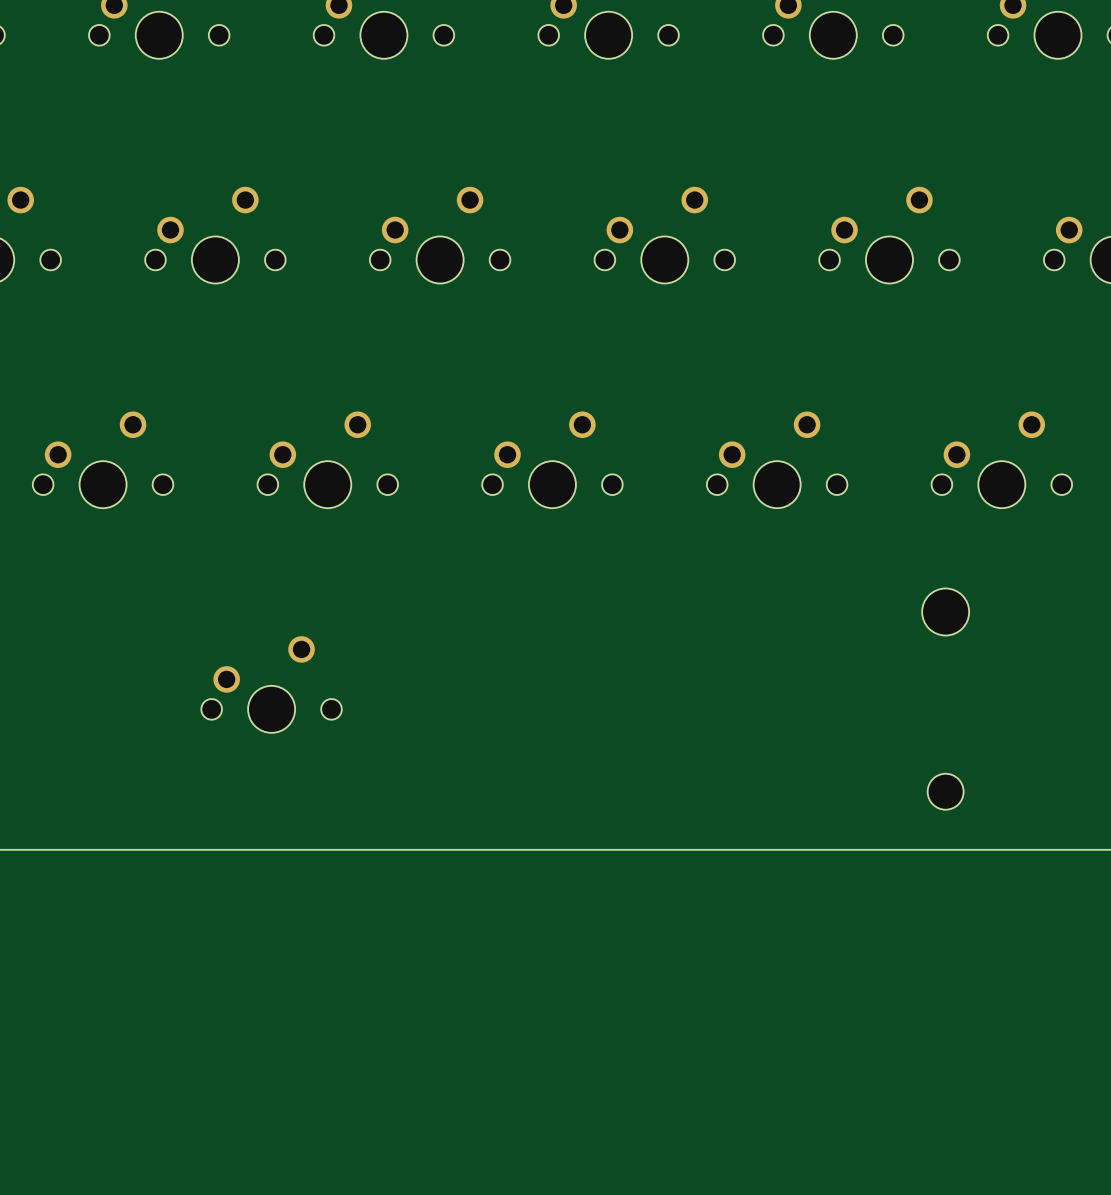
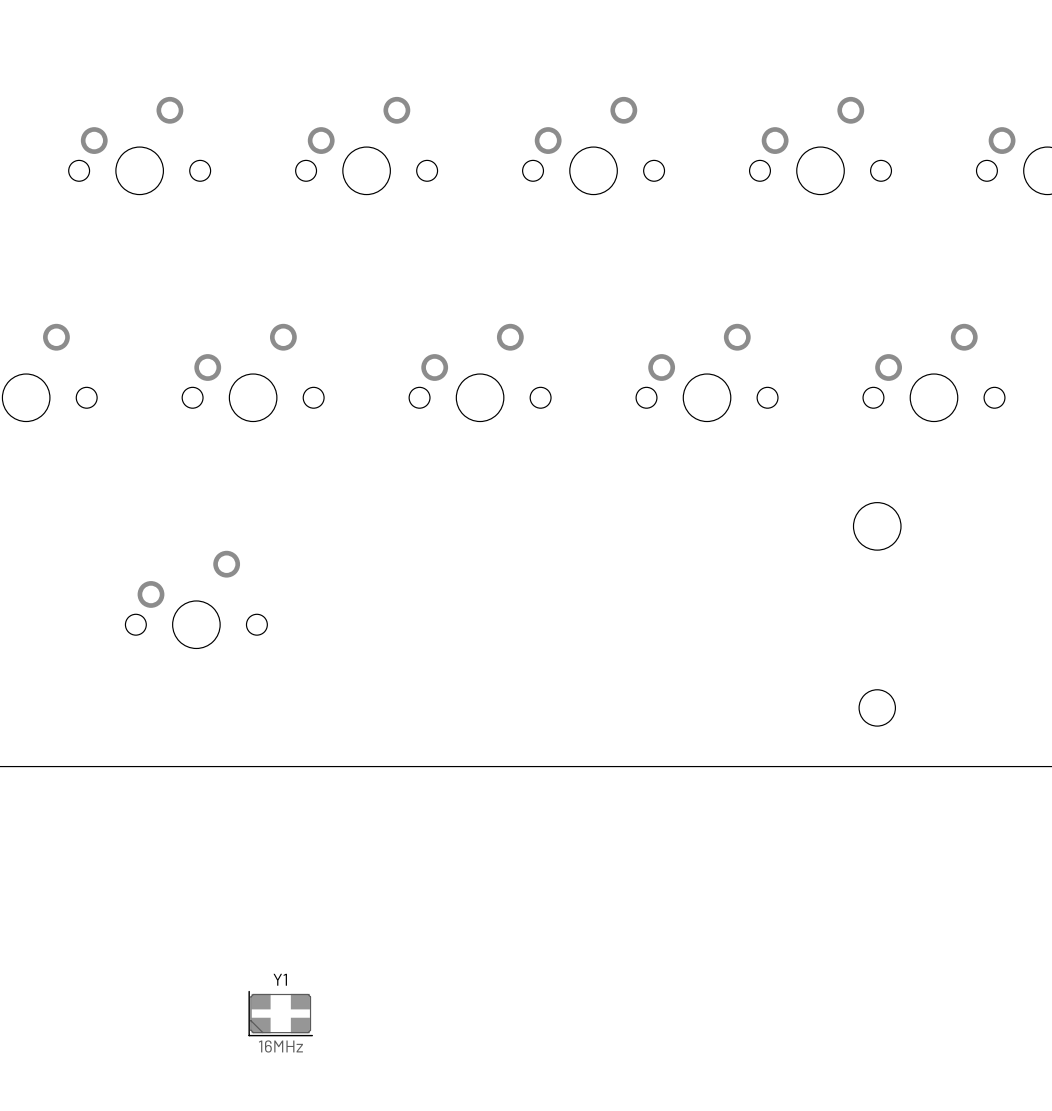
Y1: none -> 16MHz (280, 1013)

